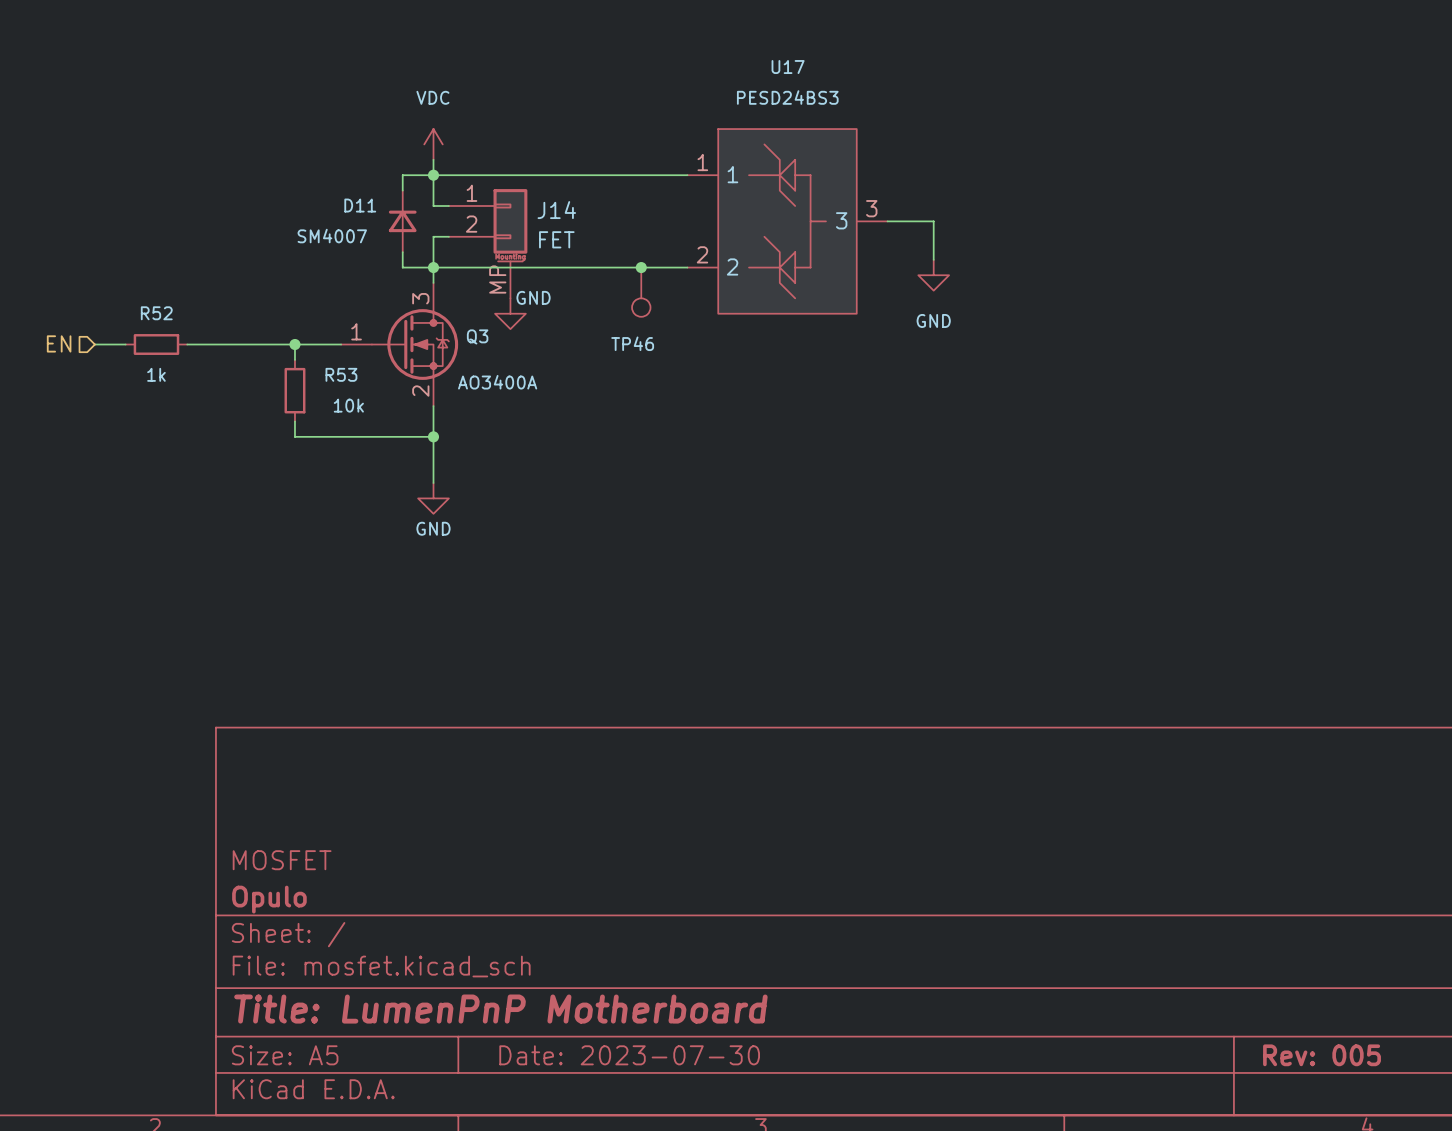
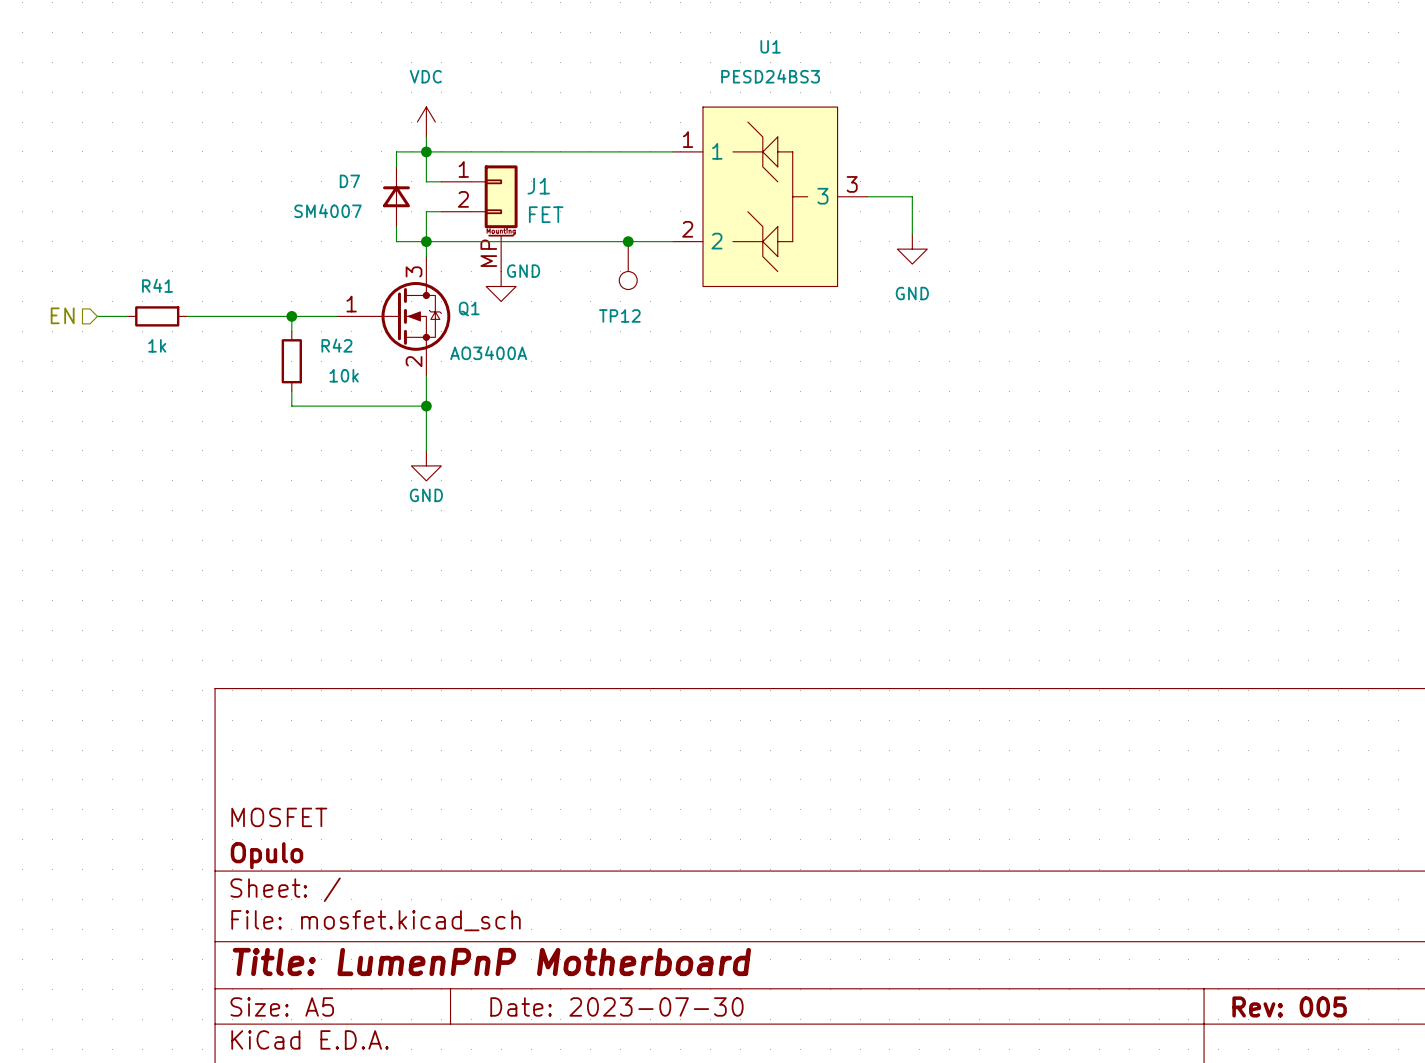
U17 name: U17 (788, 67) -> U1 (770, 46)
D11 name: D11 (360, 205) -> D7 (349, 181)
J14 name: J14 (556, 210) -> J1 (538, 186)
R52 name: R52 (156, 313) -> R41 (157, 285)
Q3 name: Q3 (477, 336) -> Q1 (469, 309)
TP46 name: TP46 (632, 343) -> TP12 (619, 315)
R53 name: R53 (341, 374) -> R42 (336, 345)

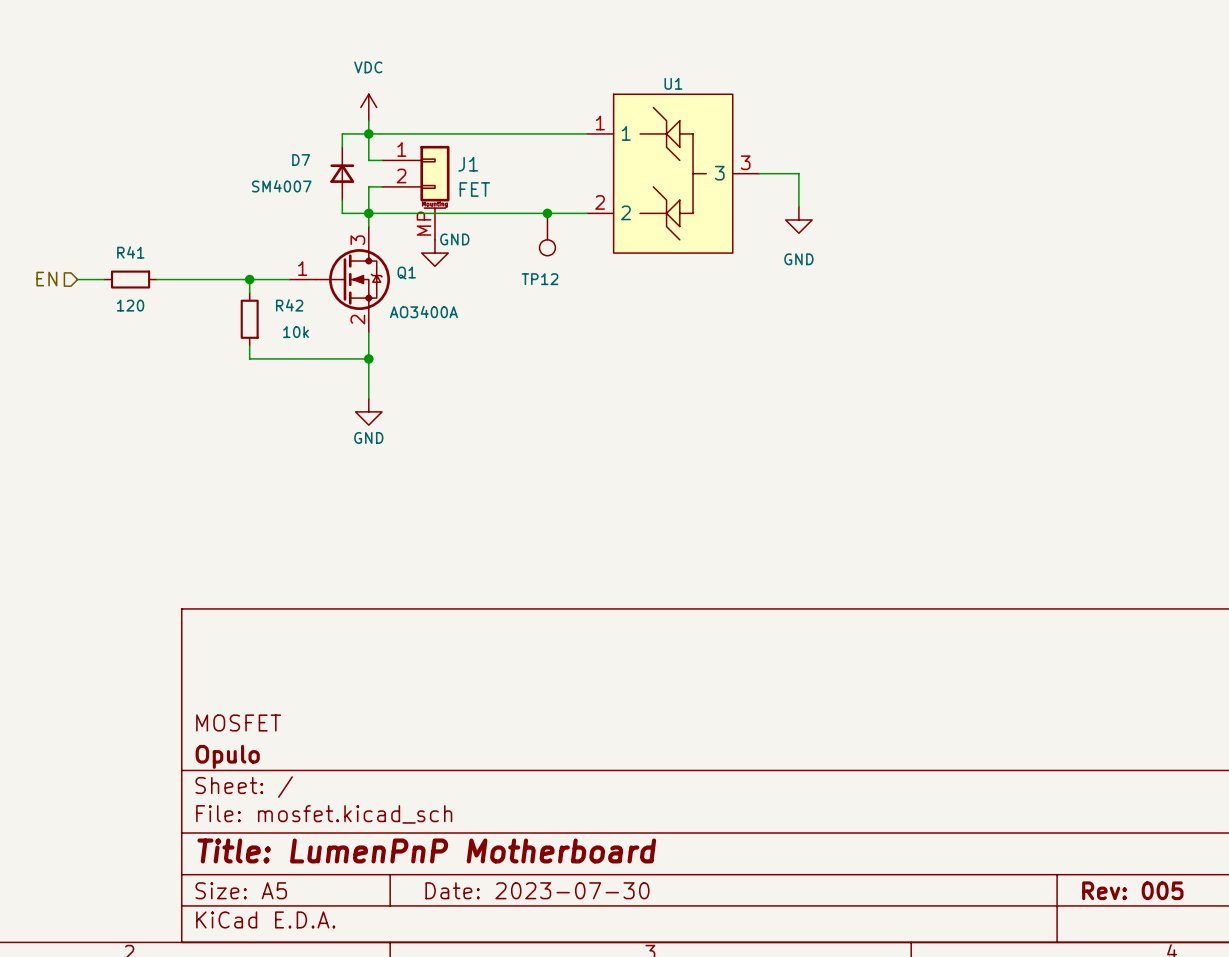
U1 name position: U1 (770, 46) -> U1 (673, 83)
U1 value: PESD24BS3 (770, 76) -> none
R41 value: 1k (157, 345) -> 120 (130, 305)

